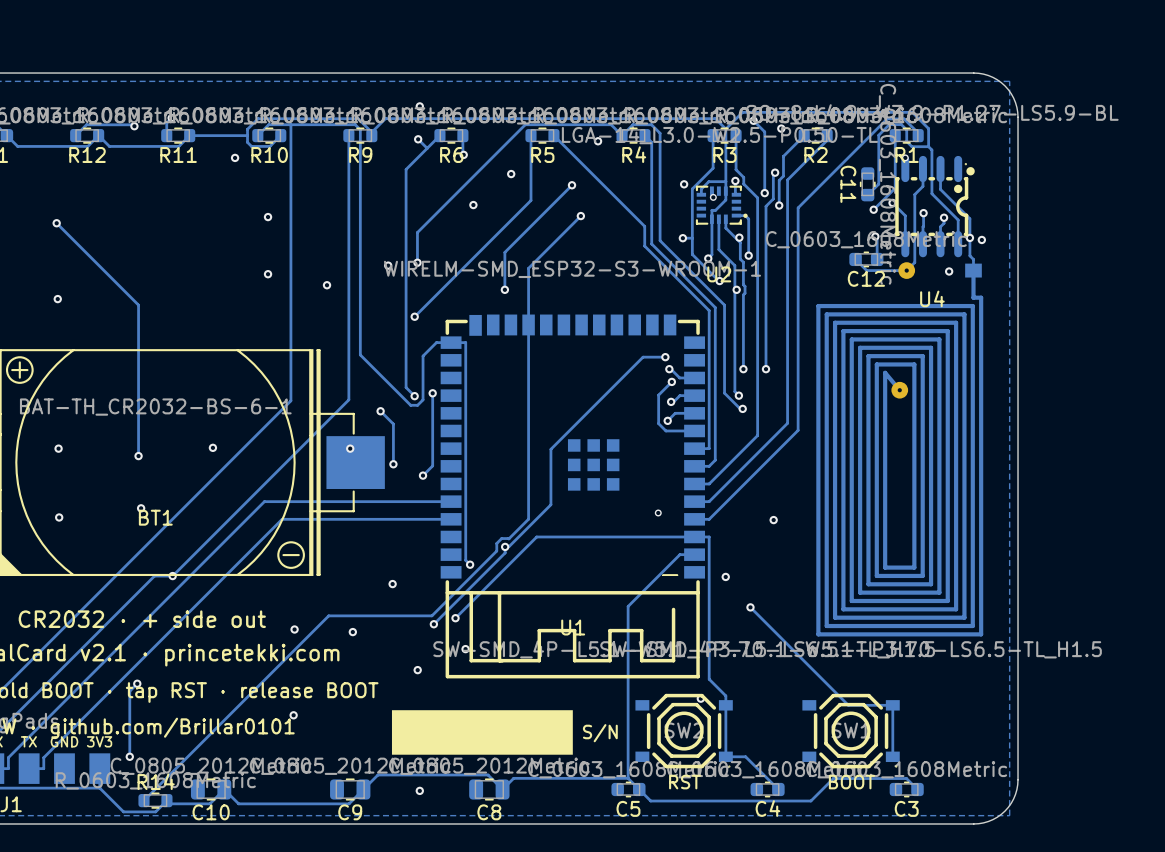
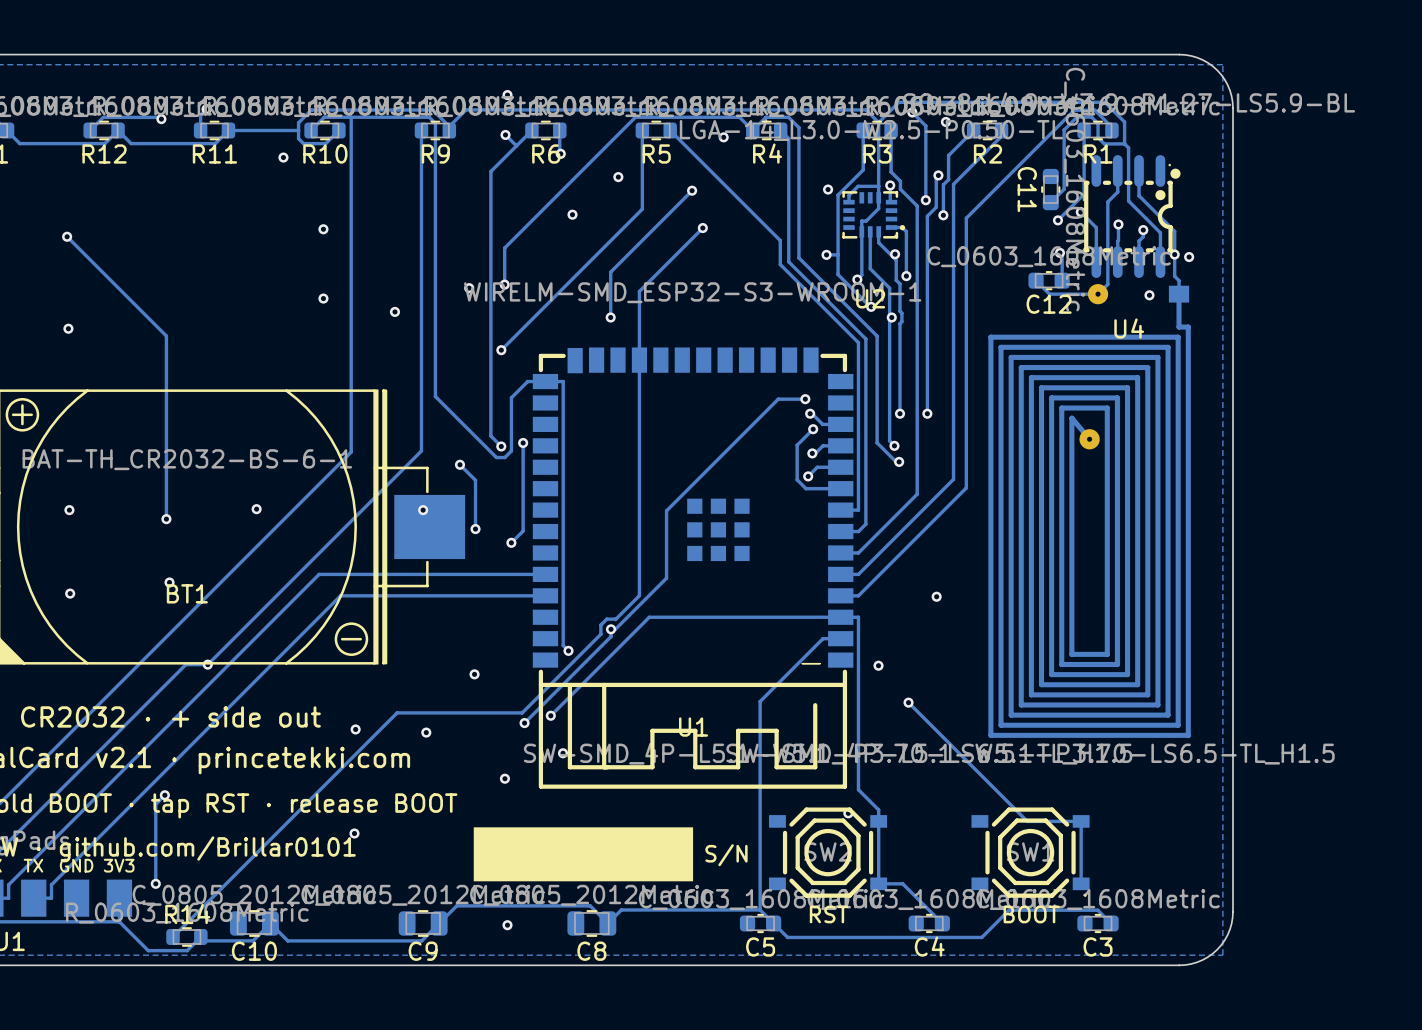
via: (905, 157) -> none
via: (713, 197) -> none
via: (658, 512) -> none

